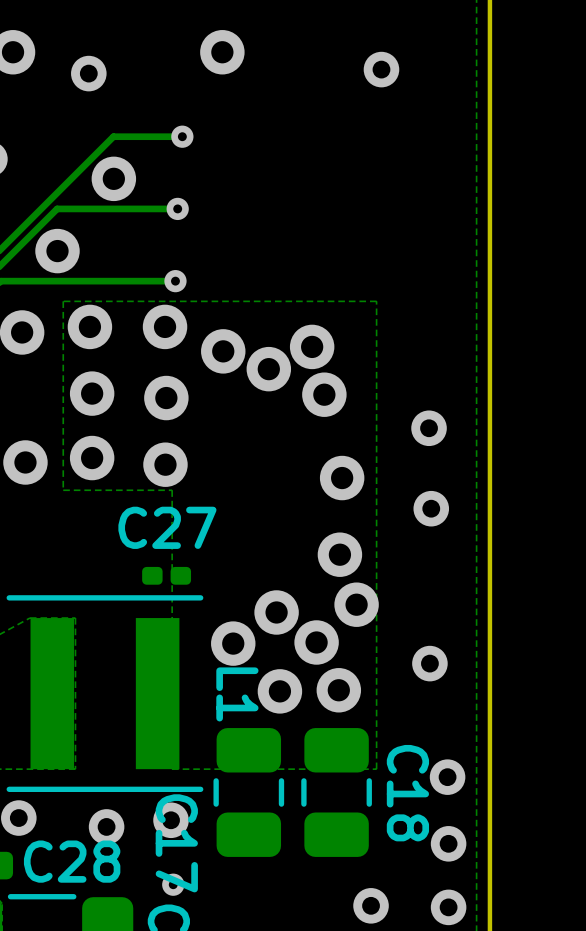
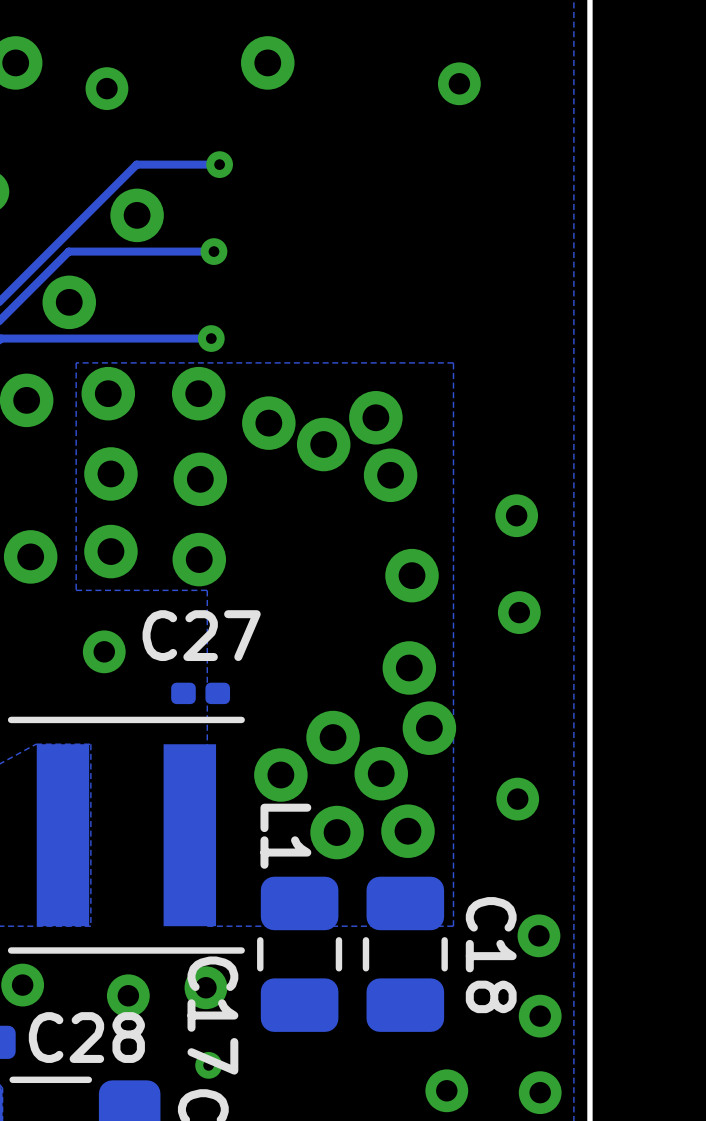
via: none -> (104, 651)

